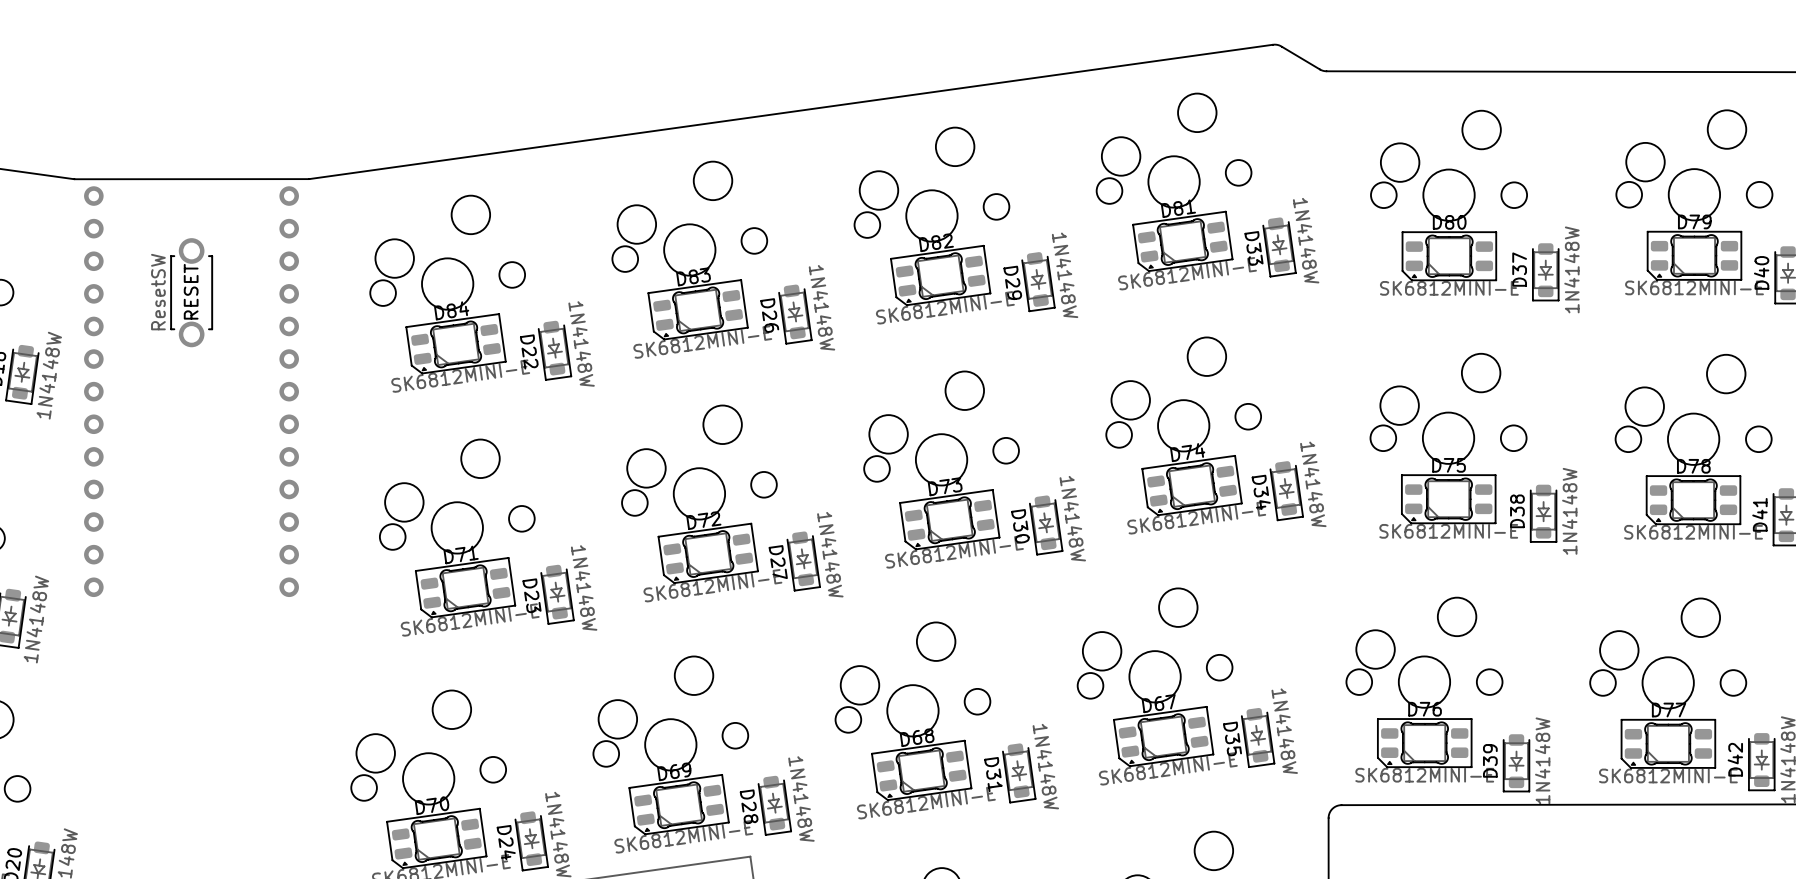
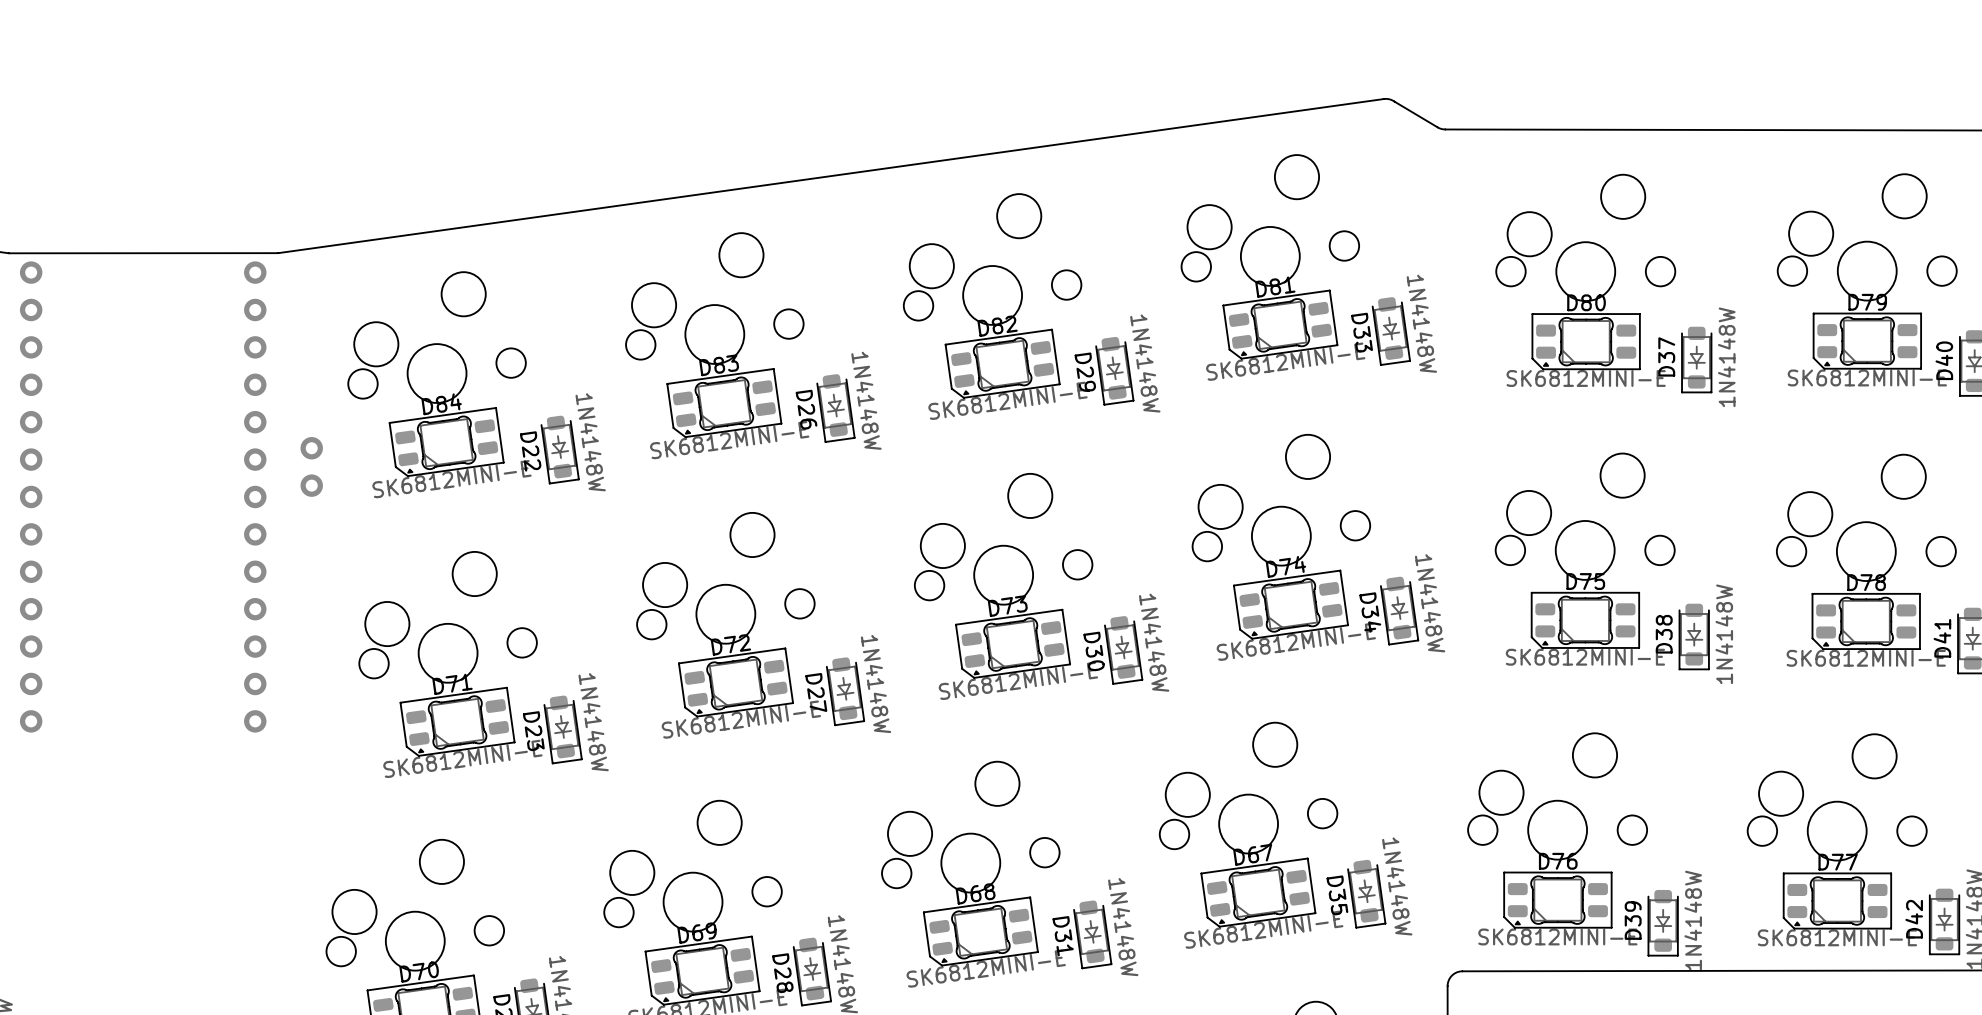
part: ResetSW (191, 292) -> none
part: none -> (311, 466)

